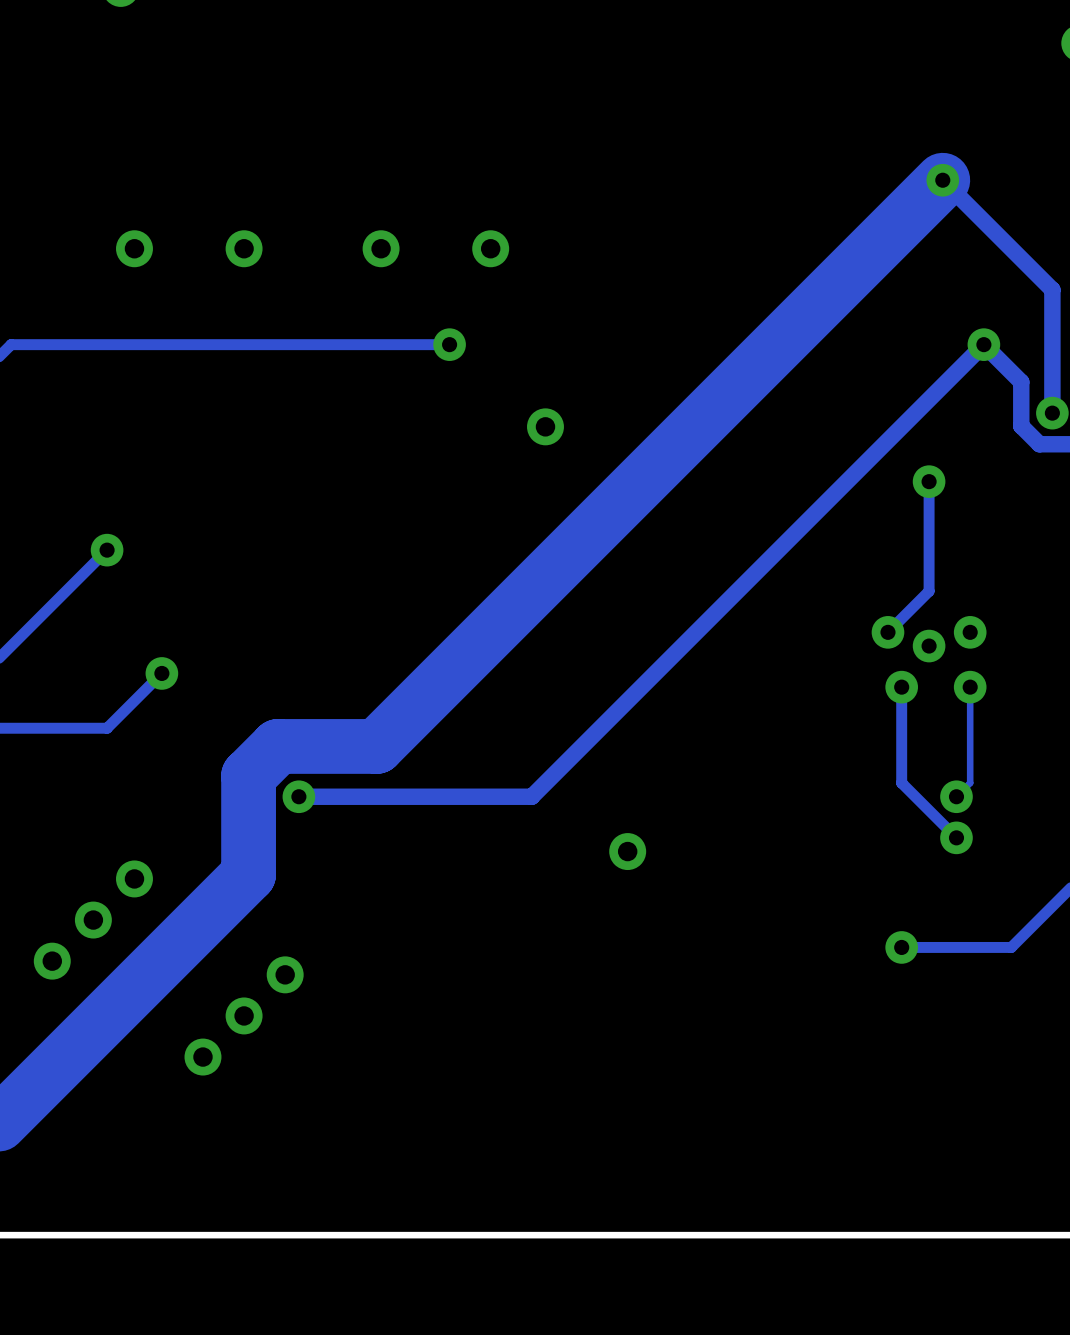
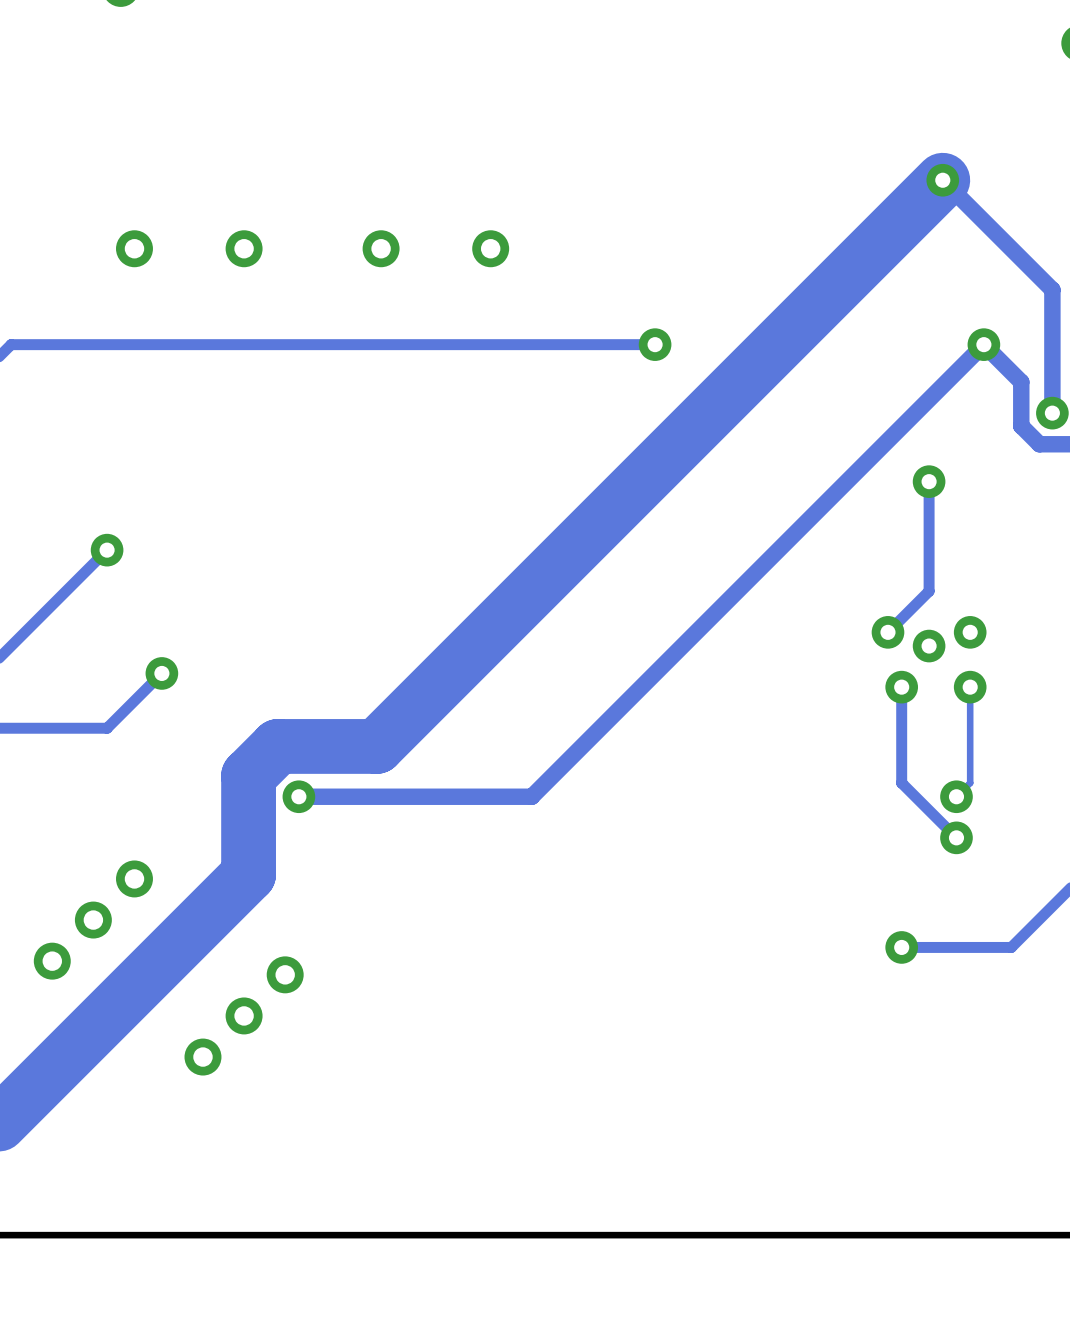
via position: (449, 344) -> (655, 344)
track: none -> (655, 344) (449, 344)
via: (545, 426) -> none
via: (627, 851) -> none

